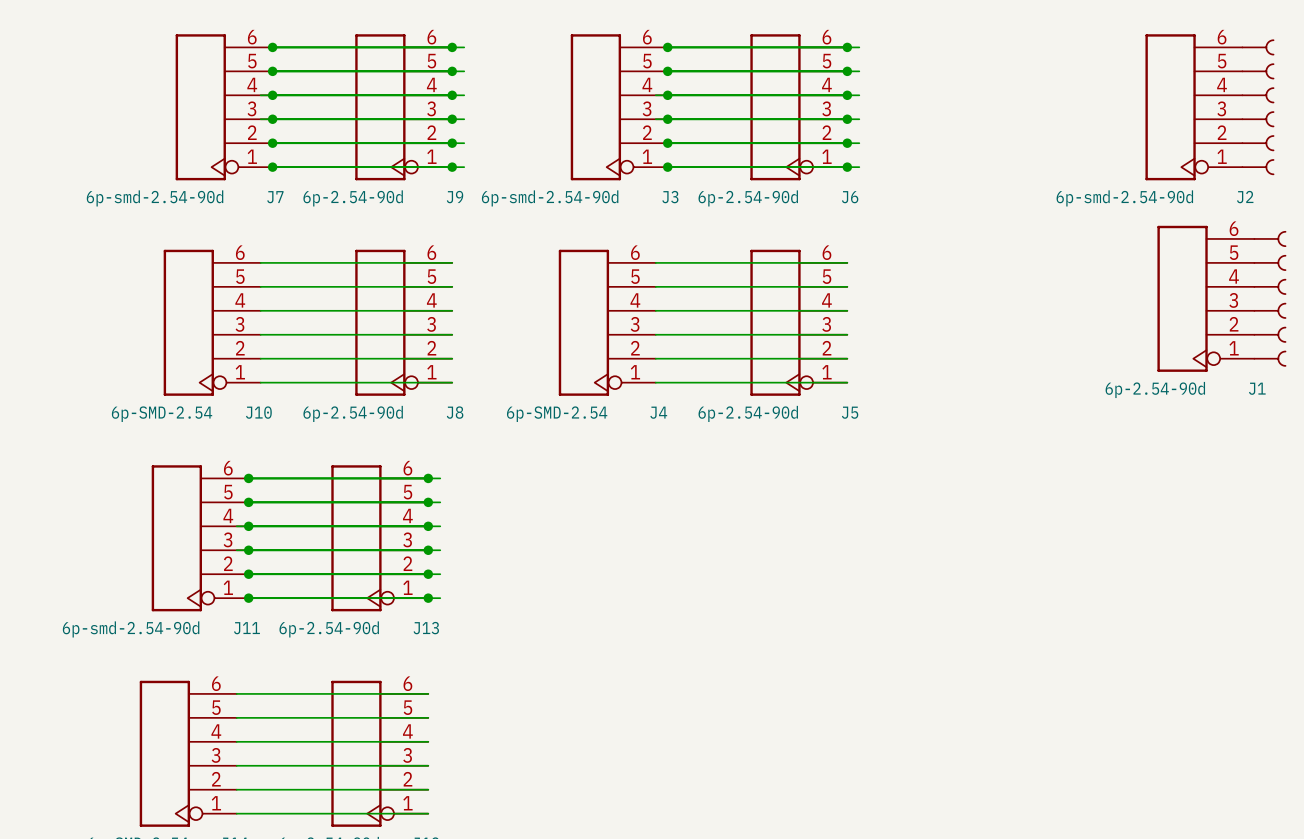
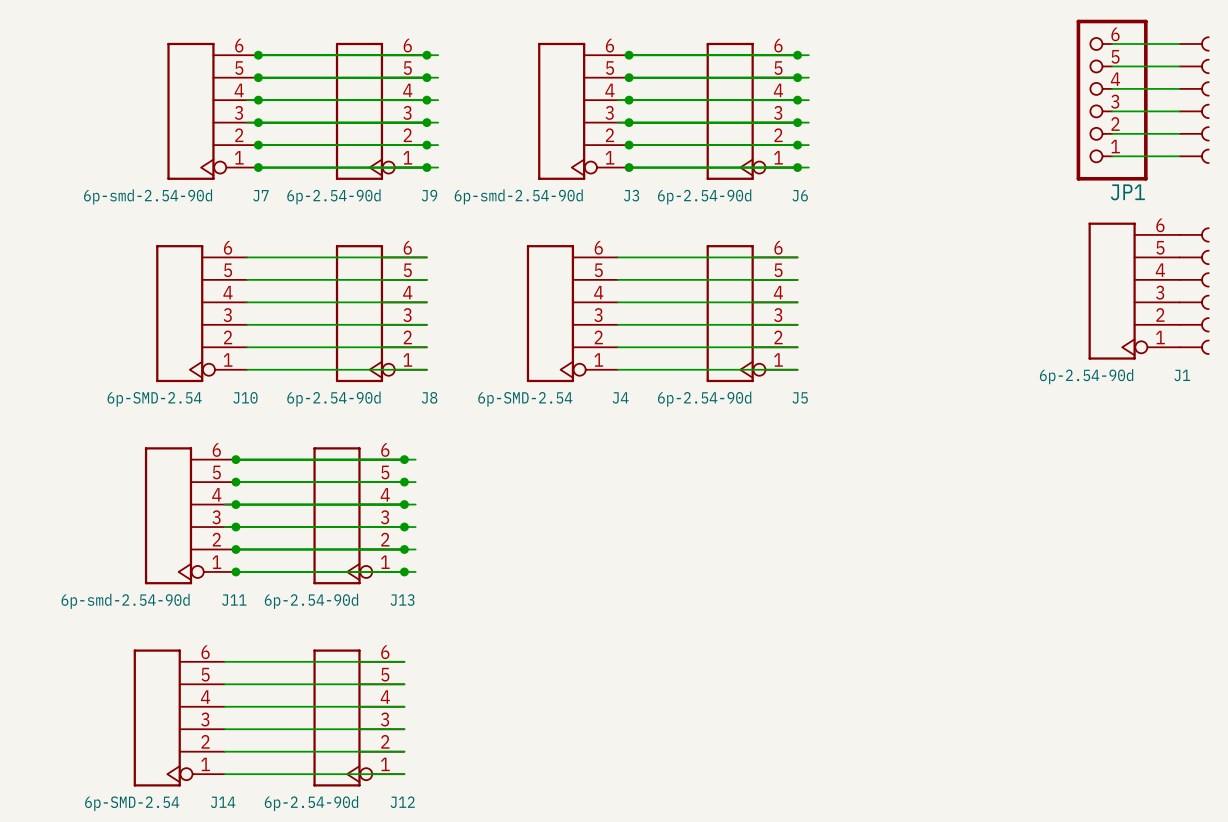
wire: none -> (1112, 43) (1179, 43)
part: none -> (1194, 43)
part: (1257, 47) -> none
wire: none -> (1112, 66) (1179, 66)
part: none -> (1194, 66)
part: (1257, 71) -> none
wire: none -> (1112, 88) (1179, 88)
part: none -> (1194, 88)
JP1: none -> (1112, 100)
part: (1257, 95) -> none
wire: none -> (1112, 111) (1179, 111)
J2: 6p-smd-2.54-90d (1193, 107) -> none
part: none -> (1194, 111)
part: (1257, 119) -> none
wire: none -> (1112, 133) (1179, 133)
part: none -> (1194, 133)
part: (1257, 143) -> none
wire: none -> (1112, 156) (1179, 156)
part: none -> (1194, 156)
part: (1257, 167) -> none

